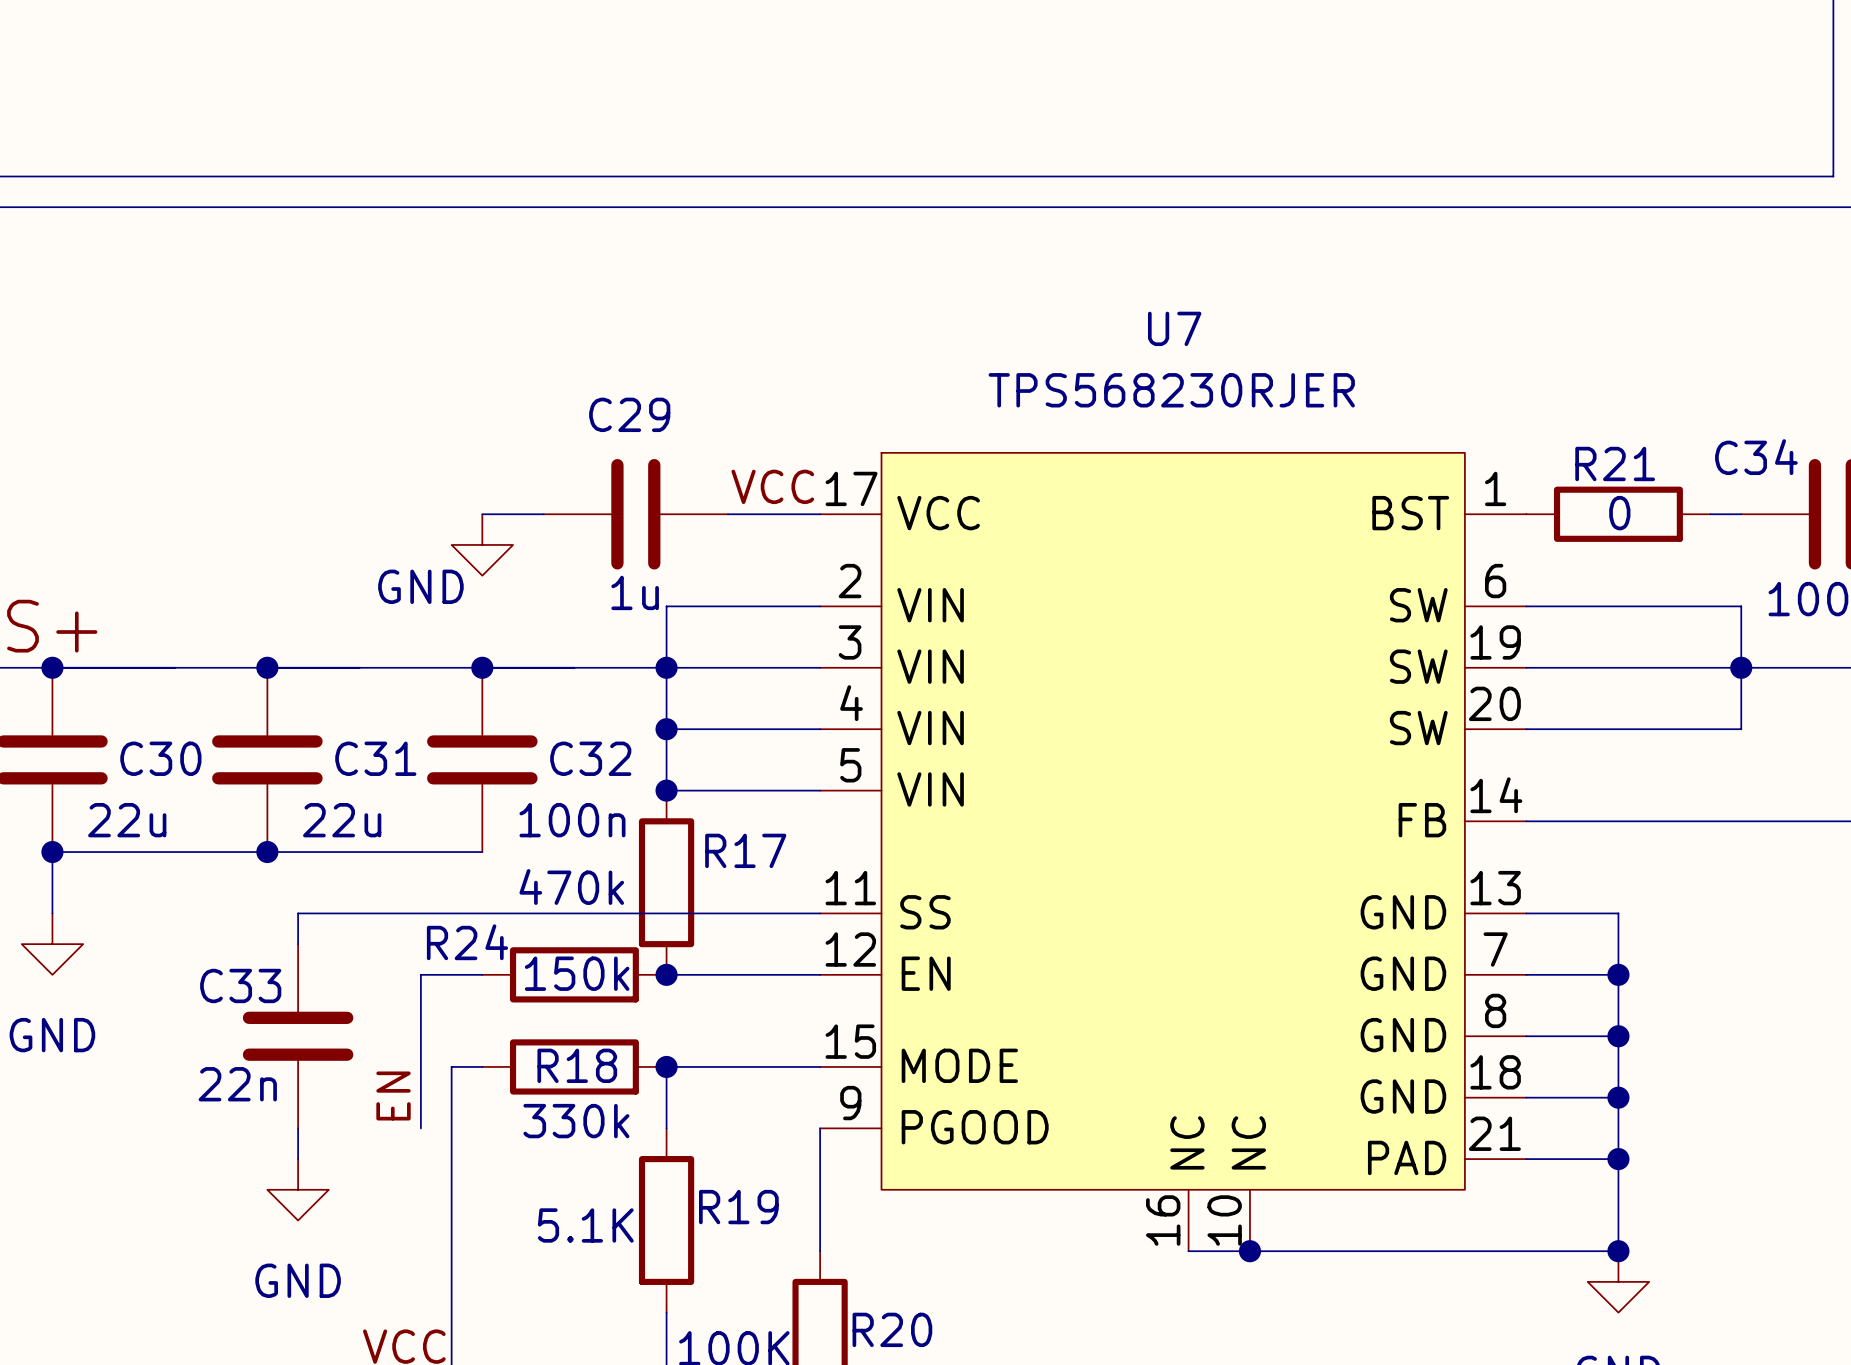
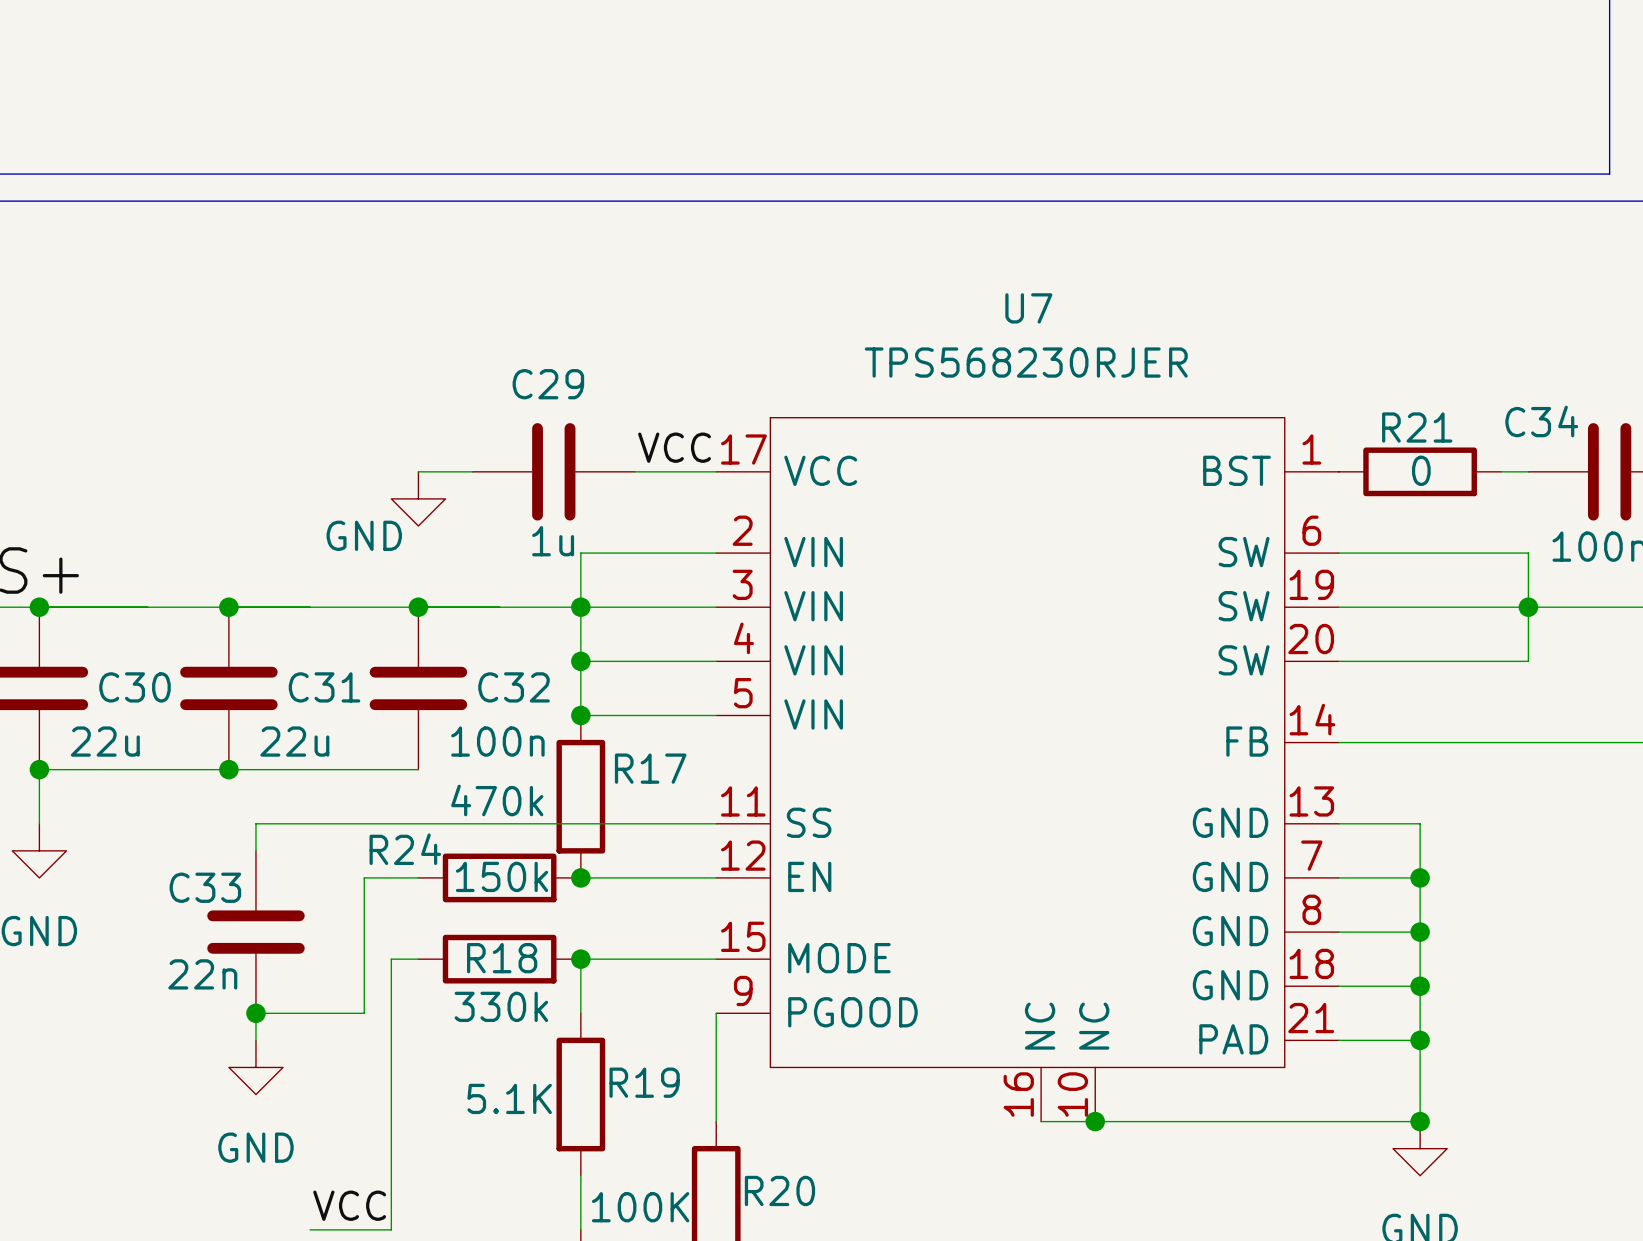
U7 symbol: [820, 452, 1527, 1252] -> [716, 417, 1339, 1122]
label: EN (393, 1095) -> none
wire: none -> (255, 1013) (364, 1013)
junction: none -> (255, 1013)

